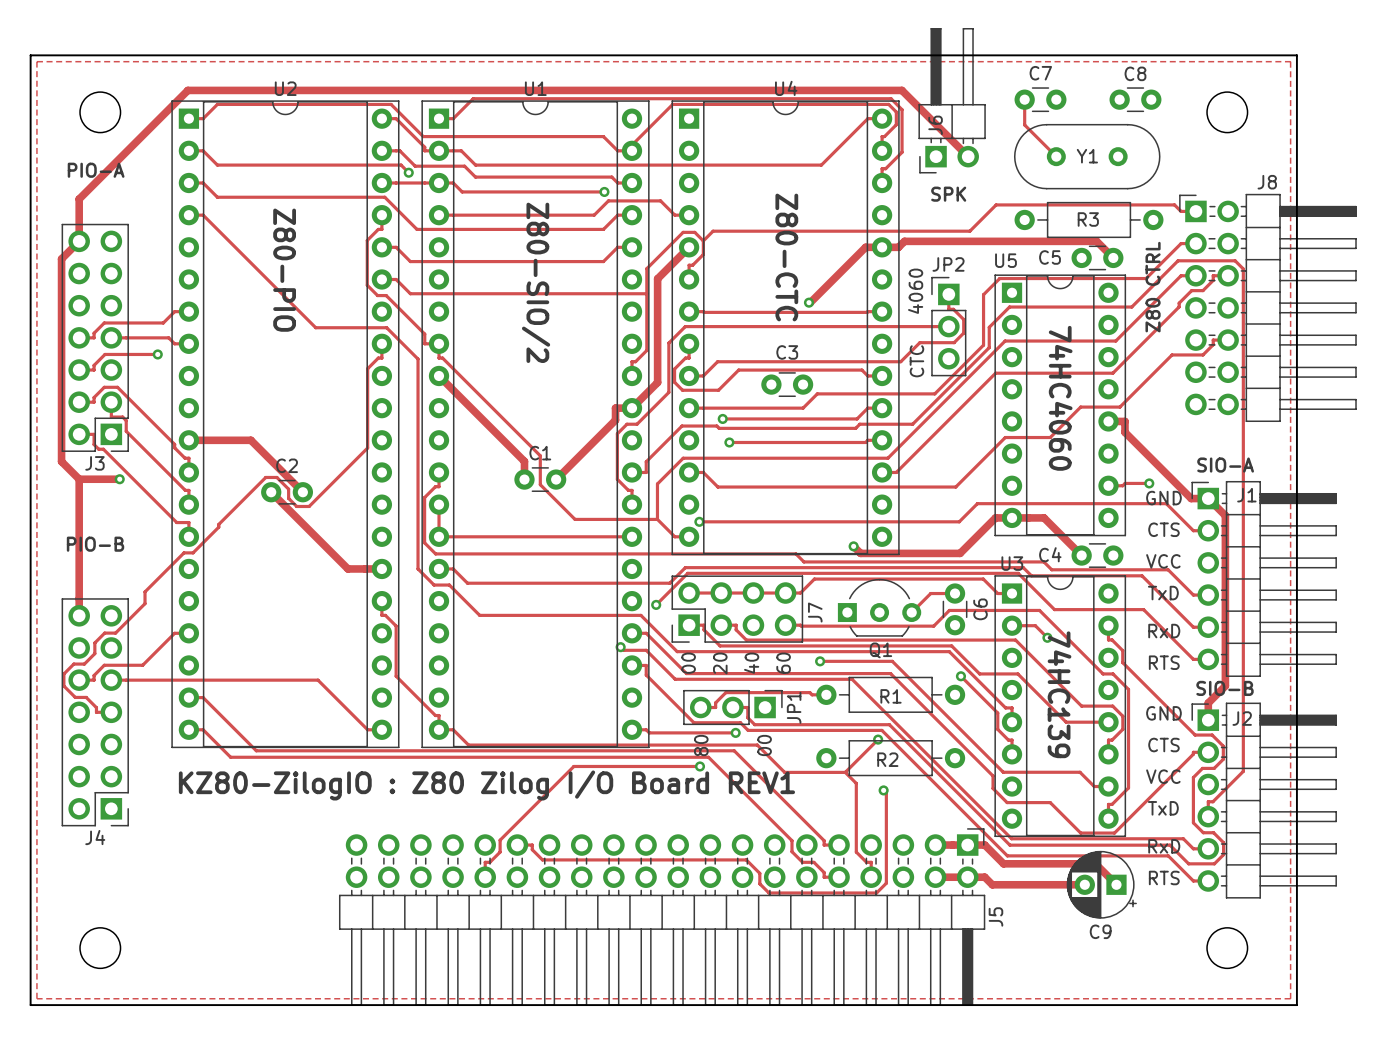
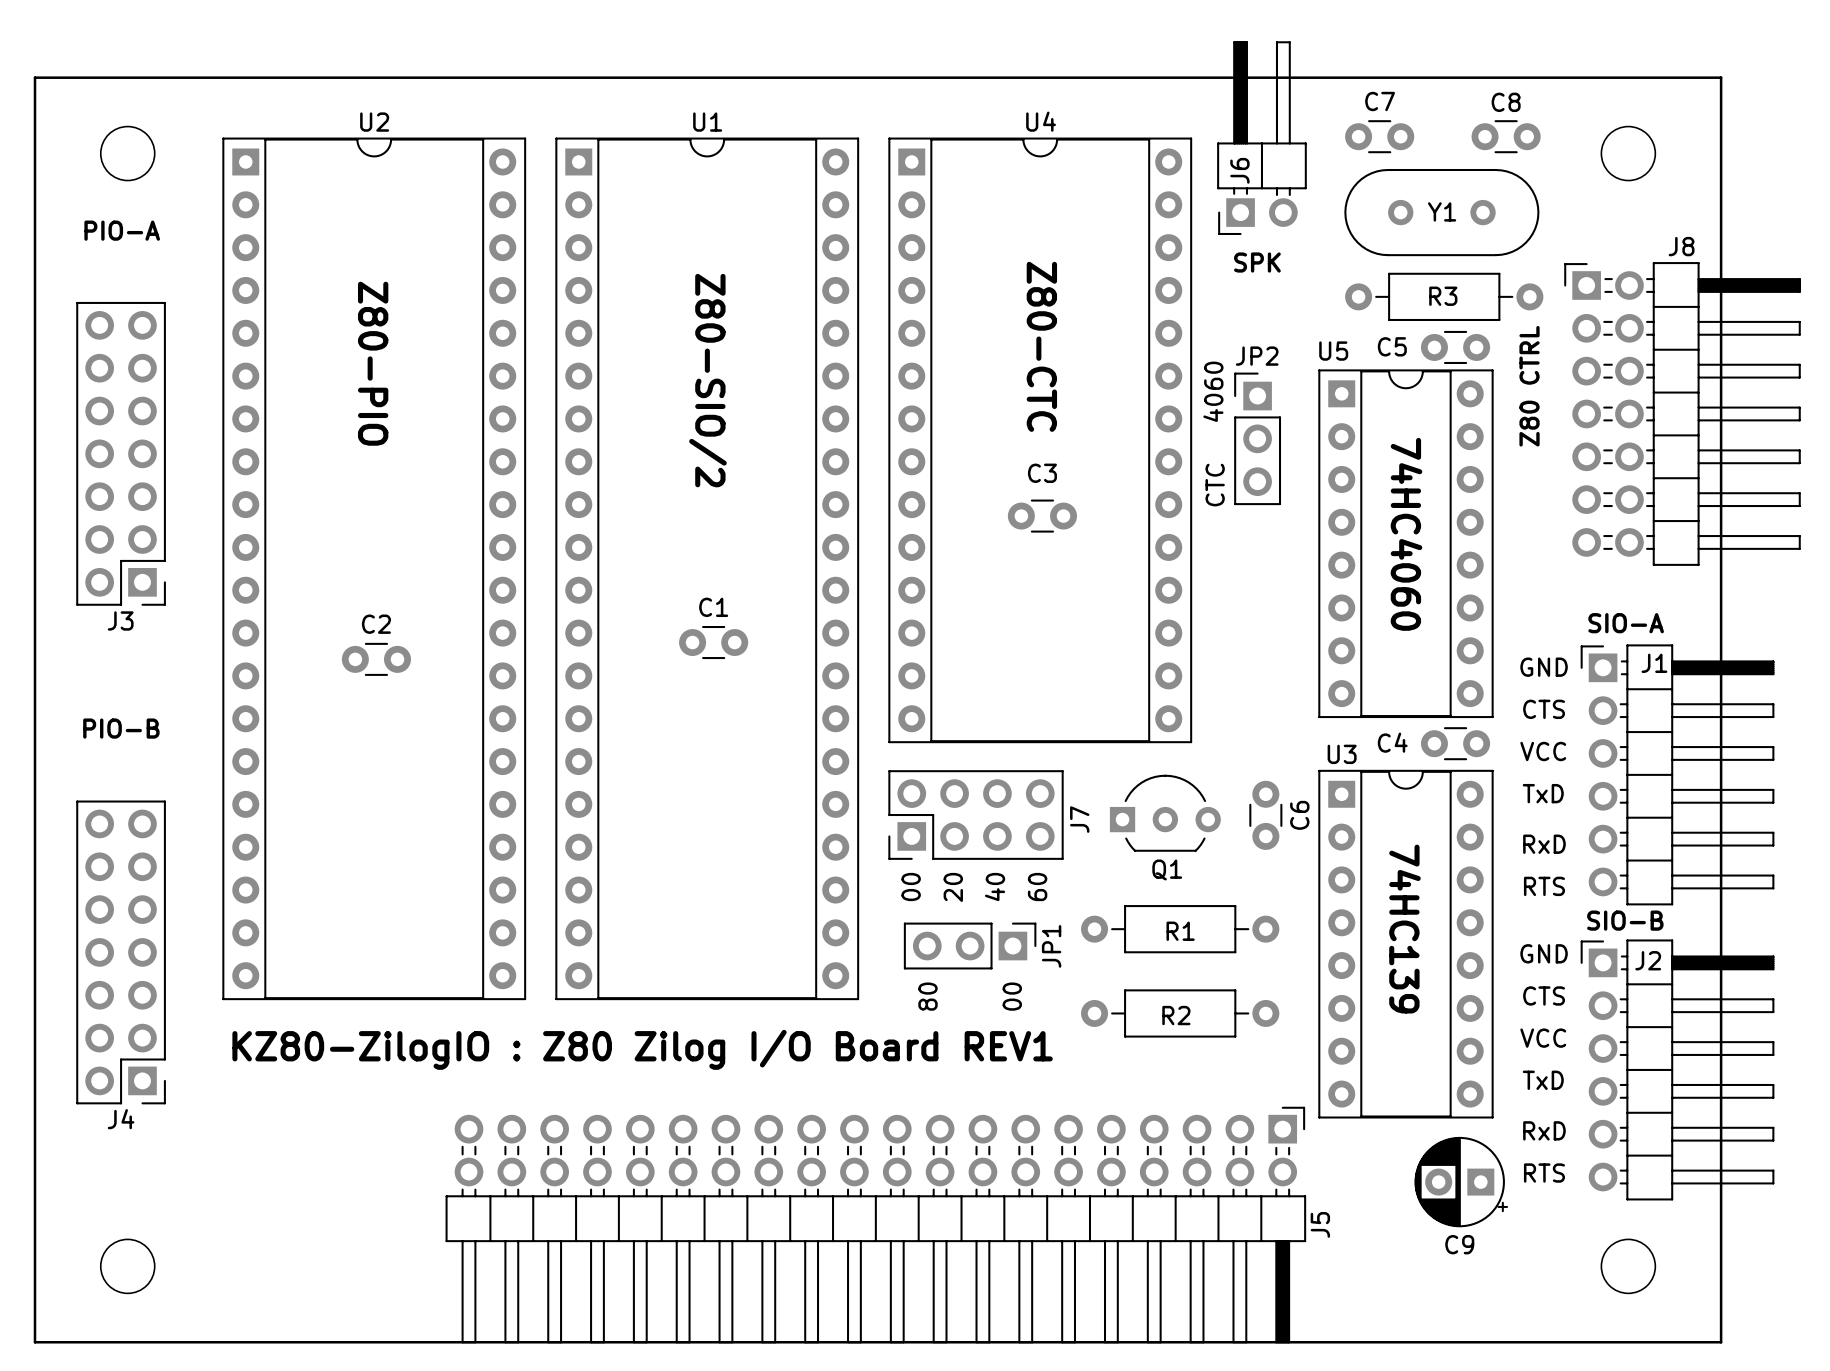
zone outline: (36, 61) (1290, 61) (1290, 998) (36, 998) (36, 61) -> none
track: (1024, 99) (1024, 125) (1056, 156) -> none
track: (188, 118) (203, 118) (217, 104) (391, 104) (423, 136) (603, 136) (617, 150) (631, 150) -> none
track: (381, 118) (396, 118) (424, 147) (424, 150) (461, 150) (475, 165) (821, 165) (867, 118) (882, 118) -> none
track: (439, 118) (453, 118) (473, 98) (891, 98) (902, 109) (902, 152) (885, 168) (882, 168) (882, 182) -> none
track: (188, 150) (203, 150) (217, 165) (401, 165) (408, 172) -> none
track: (381, 150) (399, 150) (415, 166) (464, 166) (475, 177) (611, 177) (617, 182) (631, 182) -> none
track: (626, 150) (672, 104) (888, 104) (896, 112) (896, 124) (884, 136) (882, 136) (882, 150) -> none
track: (968, 156) (901, 90) (187, 90) (79, 199) (79, 241) (61, 259) (61, 461) (79, 479) -> none
via: (408, 172) -> none
track: (188, 182) (203, 182) (217, 197) (384, 197) (416, 229) (603, 229) (617, 215) (631, 215) -> none
track: (381, 182) (453, 182) (462, 191) (604, 191) -> none
via: (604, 191) -> none
track: (1195, 211) (1181, 211) (1174, 204) (996, 204) (969, 231) (713, 231) (703, 240) -> none
track: (188, 215) (203, 215) (315, 327) (386, 327) (418, 359) (418, 568) (434, 585) (449, 585) (479, 615) (640, 615) (677, 651) (949, 651) (1005, 707) (1012, 707) (1012, 722) -> none
track: (381, 215) (381, 229) (378, 229) (367, 240) (367, 285) (377, 295) (386, 295) (424, 334) (424, 343) (439, 343) (439, 358) (442, 358) (540, 455) (540, 484) (575, 519) (657, 519) -> none
track: (439, 215) (594, 215) (608, 200) (660, 200) (674, 215) (689, 215) -> none
track: (703, 240) (694, 232) (683, 232) (646, 268) (646, 350) (635, 361) (631, 361) (631, 375) -> none
track: (703, 240) (703, 254) (692, 265) (689, 265) (689, 279) -> none
track: (1195, 243) (1181, 243) (1146, 278) (999, 278) (983, 294) (983, 345) (934, 393) (817, 393) (803, 408) (689, 408) -> none
track: (381, 247) (396, 247) (410, 261) (603, 261) (617, 247) (631, 247) -> none
track: (689, 247) (657, 278) (657, 382) (631, 408) (615, 408) (615, 420) (556, 479) -> none
track: (1113, 257) (1096, 241) (904, 241) (898, 247) (865, 247) (808, 302) -> none
track: (1195, 275) (1181, 275) (1115, 341) (1005, 341) (887, 458) (683, 458) (657, 483) (657, 519) -> none
track: (1228, 275) (1213, 275) (1213, 280) (1203, 290) (1191, 290) (1179, 303) (1179, 306) (1112, 373) (995, 373) (896, 472) (882, 472) -> none
track: (381, 279) (396, 279) (410, 293) (646, 293) -> none
track: (948, 294) (948, 309) (953, 309) (963, 319) (963, 333) (954, 342) (919, 342) (900, 361) (717, 361) (703, 375) (689, 375) -> none
via: (808, 302) -> none
track: (188, 311) (174, 311) (163, 322) (104, 322) (94, 333) (94, 337) (79, 337) -> none
track: (689, 311) (882, 311) -> none
track: (948, 326) (685, 326) (668, 343) (668, 392) (637, 424) (626, 424) (617, 433) (617, 479) (628, 490) (631, 490) (631, 504) -> none
track: (111, 337) (168, 337) (174, 343) (188, 343) -> none
track: (1228, 340) (1213, 340) (1213, 344) (1203, 354) (1172, 354) (1119, 407) (1080, 407) (1050, 437) (1005, 437) (955, 487) (717, 487) (703, 472) (689, 472) -> none
track: (381, 343) (381, 358) (378, 358) (367, 368) (367, 447) (309, 506) (296, 506) (288, 498) (288, 489) (276, 477) (265, 477) (193, 552) (184, 552) (145, 591) (145, 603) (115, 633) (104, 633) (94, 642) (94, 653) (84, 664) (73, 664) (63, 674) (63, 686) (75, 697) (86, 697) (96, 707) (96, 712) (111, 712) -> none
track: (689, 343) (689, 358) (685, 358) (674, 369) (674, 382) (682, 390) (718, 390) (738, 370) (861, 370) (867, 375) (882, 375) -> none
track: (157, 354) (104, 354) (94, 365) (94, 370) (79, 370) -> none
via: (157, 354) -> none
track: (439, 375) (524, 461) (524, 479) -> none
track: (79, 402) (94, 402) (94, 397) (104, 387) (117, 387) (174, 444) (174, 447) (185, 458) (188, 458) (188, 472) -> none
track: (111, 402) (111, 417) (122, 417) (126, 420) (126, 431) (185, 490) (188, 490) (188, 504) -> none
track: (882, 408) (867, 408) (857, 418) (722, 418) -> none
via: (722, 418) -> none
track: (1108, 421) (1124, 421) (1124, 432) (1191, 498) (1208, 498) (1225, 515) (1225, 685) (1208, 703) (1208, 720) -> none
track: (79, 434) (94, 434) (94, 444) (98, 449) (103, 449) (176, 522) (188, 522) (188, 536) -> none
track: (188, 440) (250, 440) (302, 492) -> none
track: (882, 440) (867, 440) (865, 442) (729, 442) -> none
via: (729, 442) -> none
track: (439, 472) (439, 486) (435, 486) (424, 497) (424, 542) (435, 553) (795, 553) (803, 561) (1043, 561) (1051, 569) (1168, 569) (1193, 595) (1208, 595) -> none
track: (631, 472) (646, 472) (646, 461) (682, 426) (716, 426) (719, 428) (855, 428) (859, 424) (912, 424) (989, 347) (989, 327) (1009, 307) (1131, 307) (1178, 260) (1235, 260) (1243, 269) (1243, 771) (1212, 801) (1208, 801) (1208, 816) -> none
track: (79, 479) (79, 615) -> none
track: (79, 479) (119, 479) -> none
via: (119, 479) -> none
track: (1149, 483) (1108, 485) -> none
via: (1149, 483) -> none
track: (271, 492) (347, 568) (381, 568) -> none
track: (439, 504) (439, 536) (631, 536) -> none
track: (657, 519) (674, 536) (689, 536) -> none
track: (699, 521) (959, 521) (977, 503) (1166, 503) (1193, 530) (1208, 530) -> none
via: (699, 521) -> none
track: (853, 546) (860, 553) (960, 553) (995, 517) (1044, 517) (1081, 555) -> none
via: (853, 546) -> none
track: (439, 568) (453, 568) (467, 583) (669, 583) (685, 567) (1023, 567) (1031, 575) (1142, 575) (1193, 627) (1208, 627) -> none
track: (689, 593) (800, 593) (814, 579) (983, 579) (997, 593) (1012, 593) -> none
track: (955, 593) (930, 593) (911, 612) -> none
track: (381, 601) (381, 615) (385, 615) (396, 626) (396, 676) (435, 715) (439, 715) (439, 729) (453, 729) (468, 745) (757, 745) (784, 772) (845, 772) -> none
track: (656, 604) (687, 573) (1018, 573) (1054, 609) (1143, 609) (1193, 659) (1208, 659) -> none
via: (656, 604) -> none
track: (689, 625) (703, 625) (703, 629) (720, 645) (951, 645) (979, 673) (1017, 673) (1066, 722) (1108, 722) -> none
track: (721, 625) (736, 625) (736, 629) (746, 640) (1015, 640) (1081, 706) (1112, 706) (1122, 716) (1122, 729) (1112, 740) (1108, 740) (1108, 754) -> none
track: (785, 625) (933, 626) (949, 610) (1039, 610) (1103, 673) (1113, 673) (1128, 689) (1128, 787) (1112, 804) (1108, 804) (1108, 818) -> none
track: (1012, 625) (1035, 625) (1047, 637) -> none
track: (1108, 625) (1108, 639) (1112, 639) (1122, 650) (1122, 662) (1195, 735) (1212, 735) (1223, 746) (1223, 759) (1214, 768) (1202, 768) (1193, 777) (1193, 822) (1203, 832) (1213, 832) (1223, 842) (1223, 854) (1214, 863) (1188, 863) (1170, 845) (1009, 845) (889, 724) (754, 724) (747, 717) (747, 707) (732, 707) -> none
track: (188, 633) (174, 633) (142, 665) (104, 665) (94, 675) (94, 680) (79, 680) -> none
track: (631, 633) (646, 633) (686, 673) (890, 673) (993, 776) (993, 788) (1007, 802) (1050, 802) (1080, 833) (1114, 833) (1193, 752) (1208, 752) -> none
via: (1047, 637) -> none
track: (620, 647) (623, 650) (646, 650) (675, 679) (852, 679) (1011, 838) (1183, 838) (1193, 848) (1208, 848) -> none
via: (620, 647) -> none
track: (820, 661) (892, 661) (1003, 772) (1080, 772) (1094, 786) (1108, 786) -> none
via: (820, 661) -> none
track: (631, 665) (646, 665) (646, 675) (693, 722) (740, 722) (748, 730) (881, 730) (1007, 855) (1168, 855) (1193, 880) (1208, 880) -> none
track: (960, 676) (997, 713) (997, 729) (1008, 740) (1012, 740) (1012, 754) -> none
via: (960, 676) -> none
track: (111, 680) (318, 680) (367, 729) (381, 729) -> none
track: (826, 694) (812, 694) (809, 692) (725, 692) (715, 702) (715, 707) (700, 707) -> none
track: (188, 697) (203, 697) (256, 750) (734, 750) (824, 840) (824, 845) (839, 845) -> none
track: (188, 729) (203, 729) (230, 757) (708, 757) (791, 840) (791, 851) (802, 862) (813, 862) (824, 872) (824, 877) (839, 877) -> none
track: (631, 729) (646, 729) (649, 732) (735, 732) -> none
via: (735, 732) -> none
track: (878, 739) (845, 772) -> none
via: (878, 739) -> none
track: (699, 766) (573, 766) (500, 840) (500, 852) (489, 862) (485, 862) (485, 877) -> none
via: (699, 766) -> none
track: (845, 772) (856, 783) (856, 852) (866, 862) (871, 862) (871, 877) -> none
track: (883, 790) (886, 793) (886, 883) (876, 892) (768, 892) (759, 883) (759, 873) (746, 859) (542, 859) (532, 849) (532, 845) (517, 845) -> none
via: (883, 790) -> none
track: (935, 845) (984, 845) (1003, 863) (1095, 863) (1116, 884) -> none
track: (935, 877) (984, 877) (992, 884) (1084, 884) -> none

